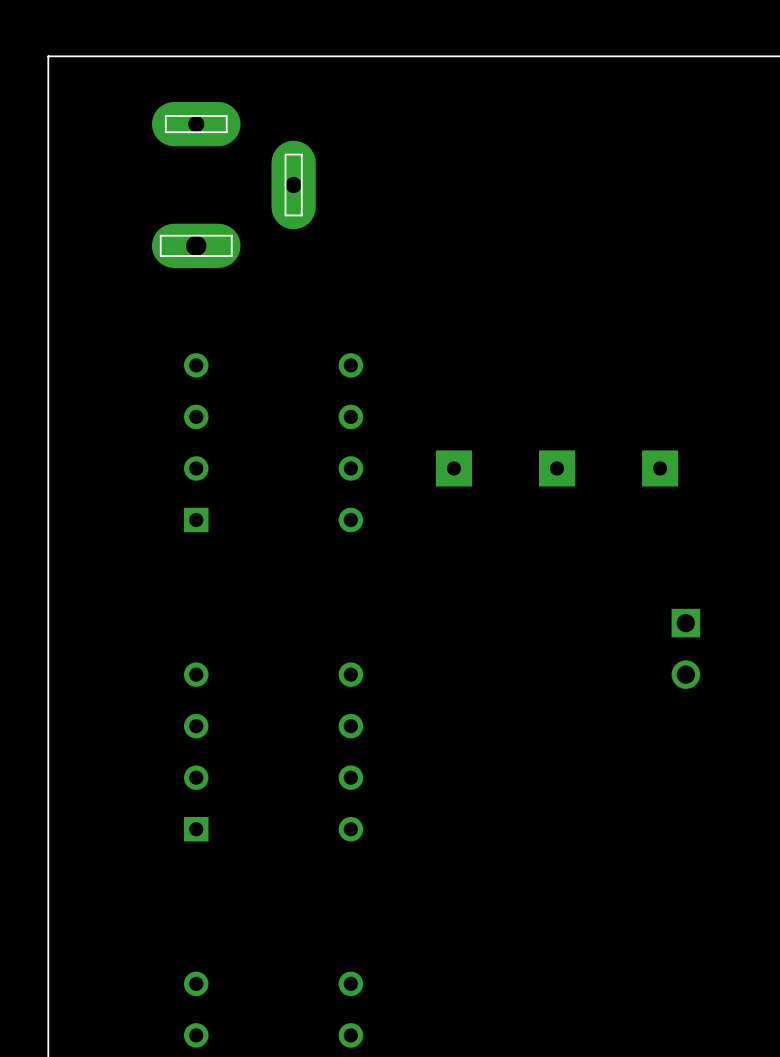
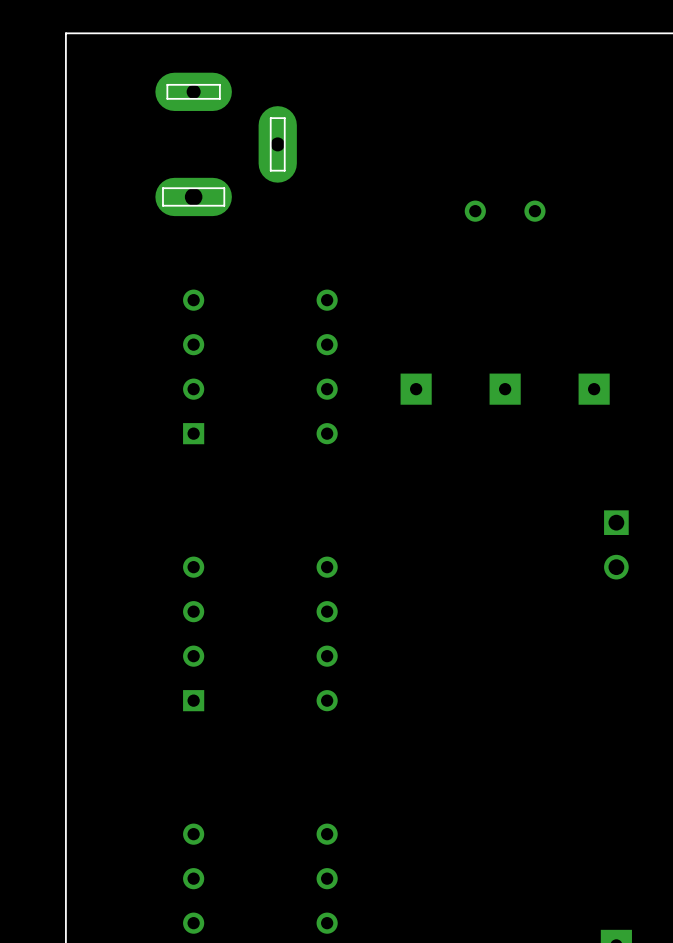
part: none -> (505, 211)

